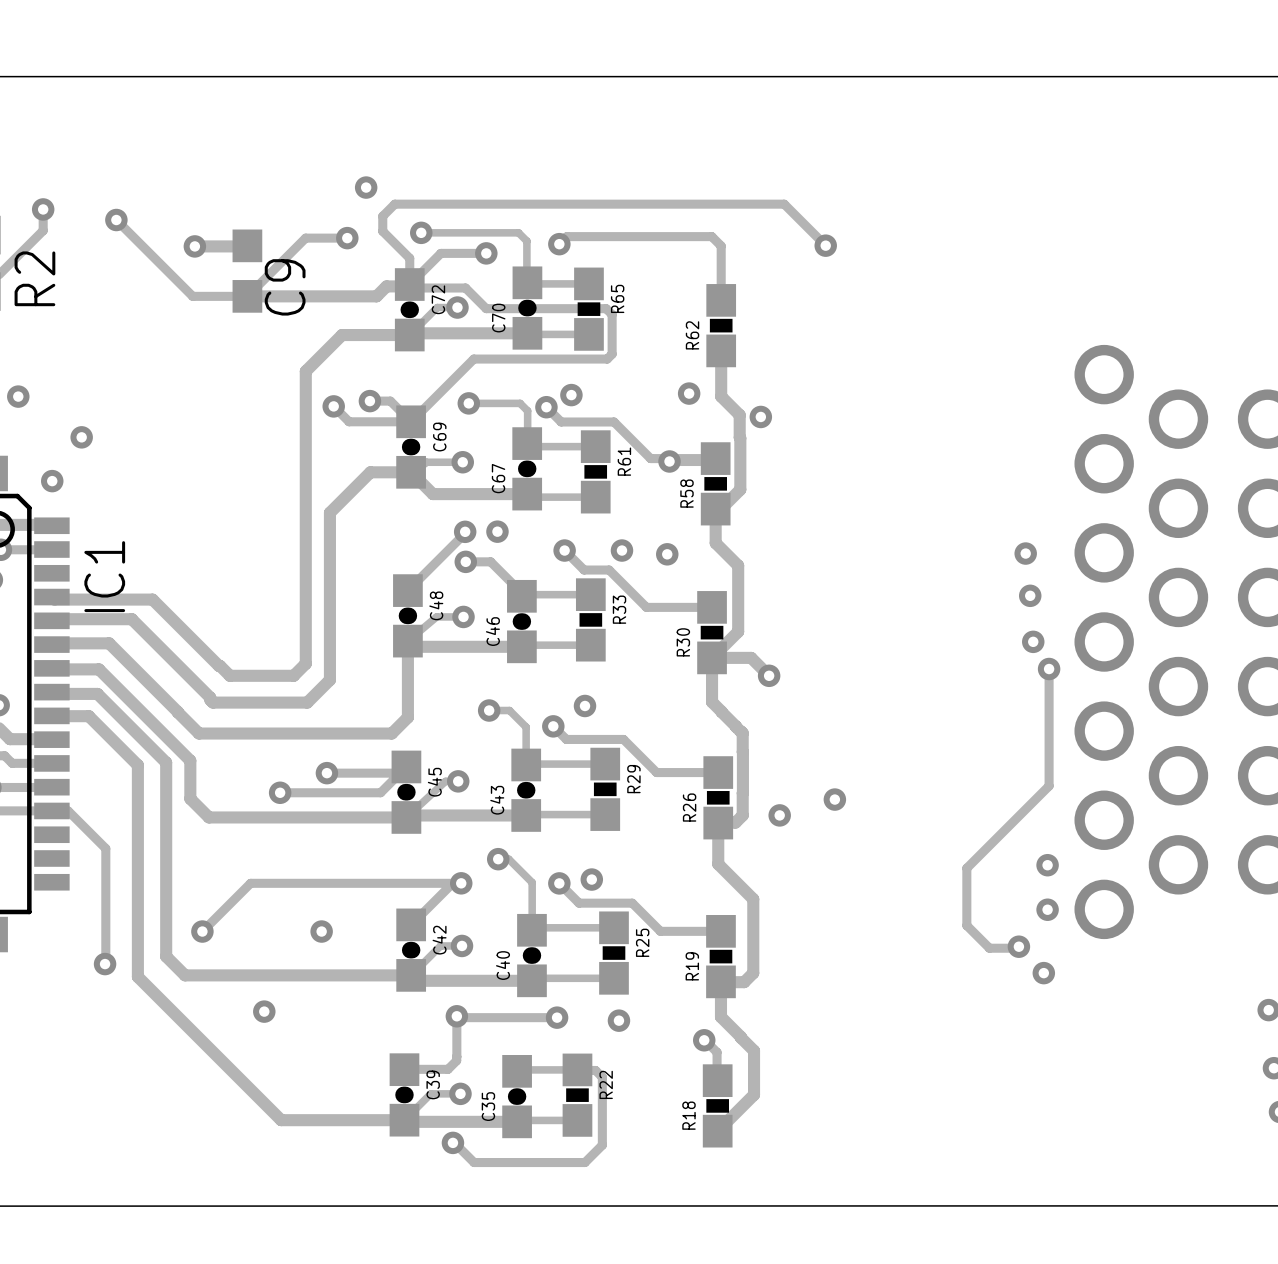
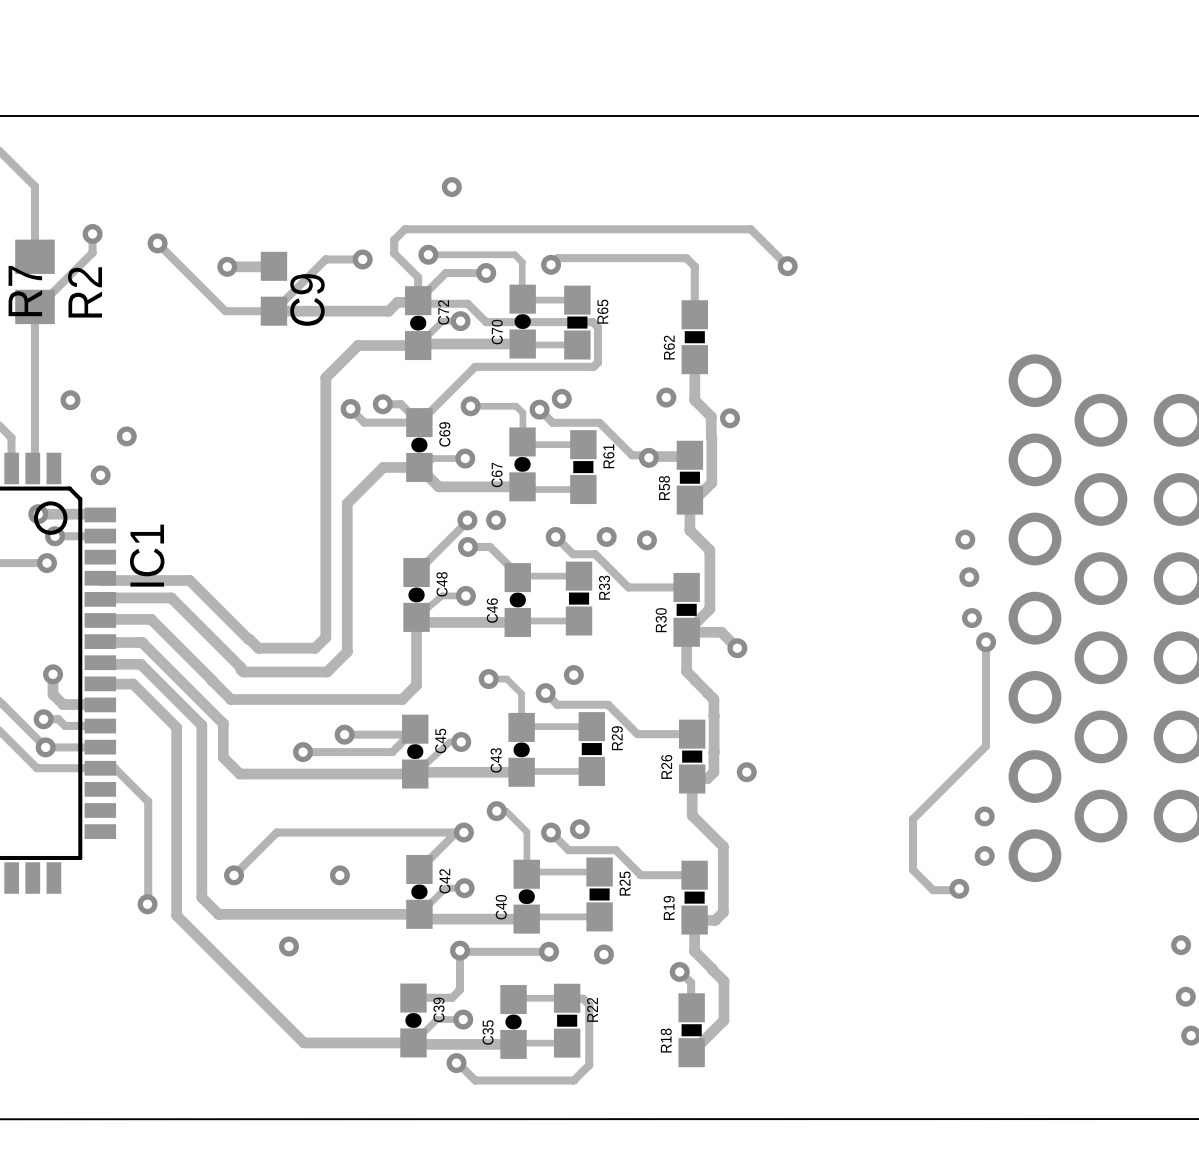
via position: (366, 187) -> (451, 187)
via: (834, 799) -> none
via: (1043, 973) -> none

